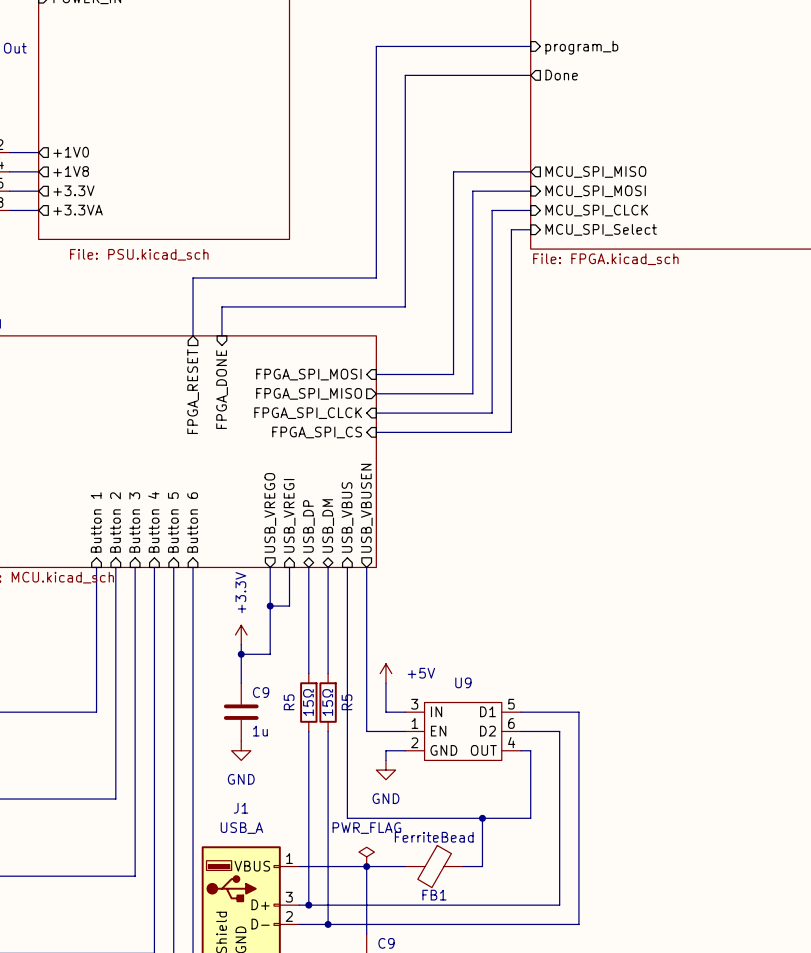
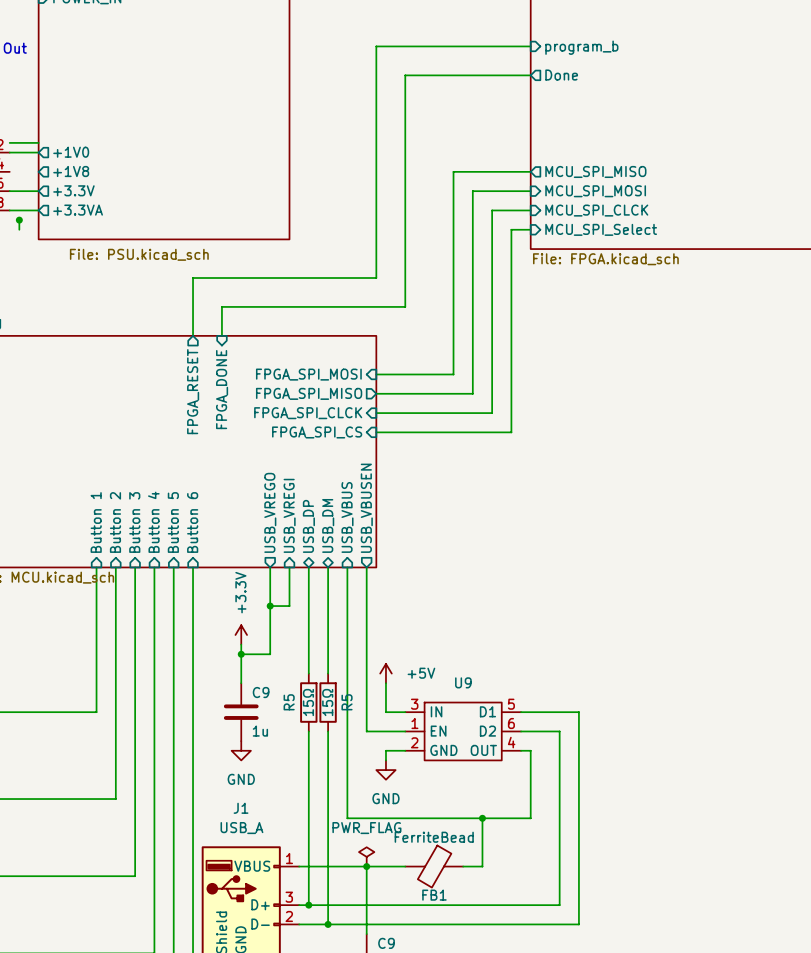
wire: (9, 171) (38, 171) -> (9, 142) (38, 142)
wire: none -> (19, 220) (19, 229)
junction: none -> (19, 220)

